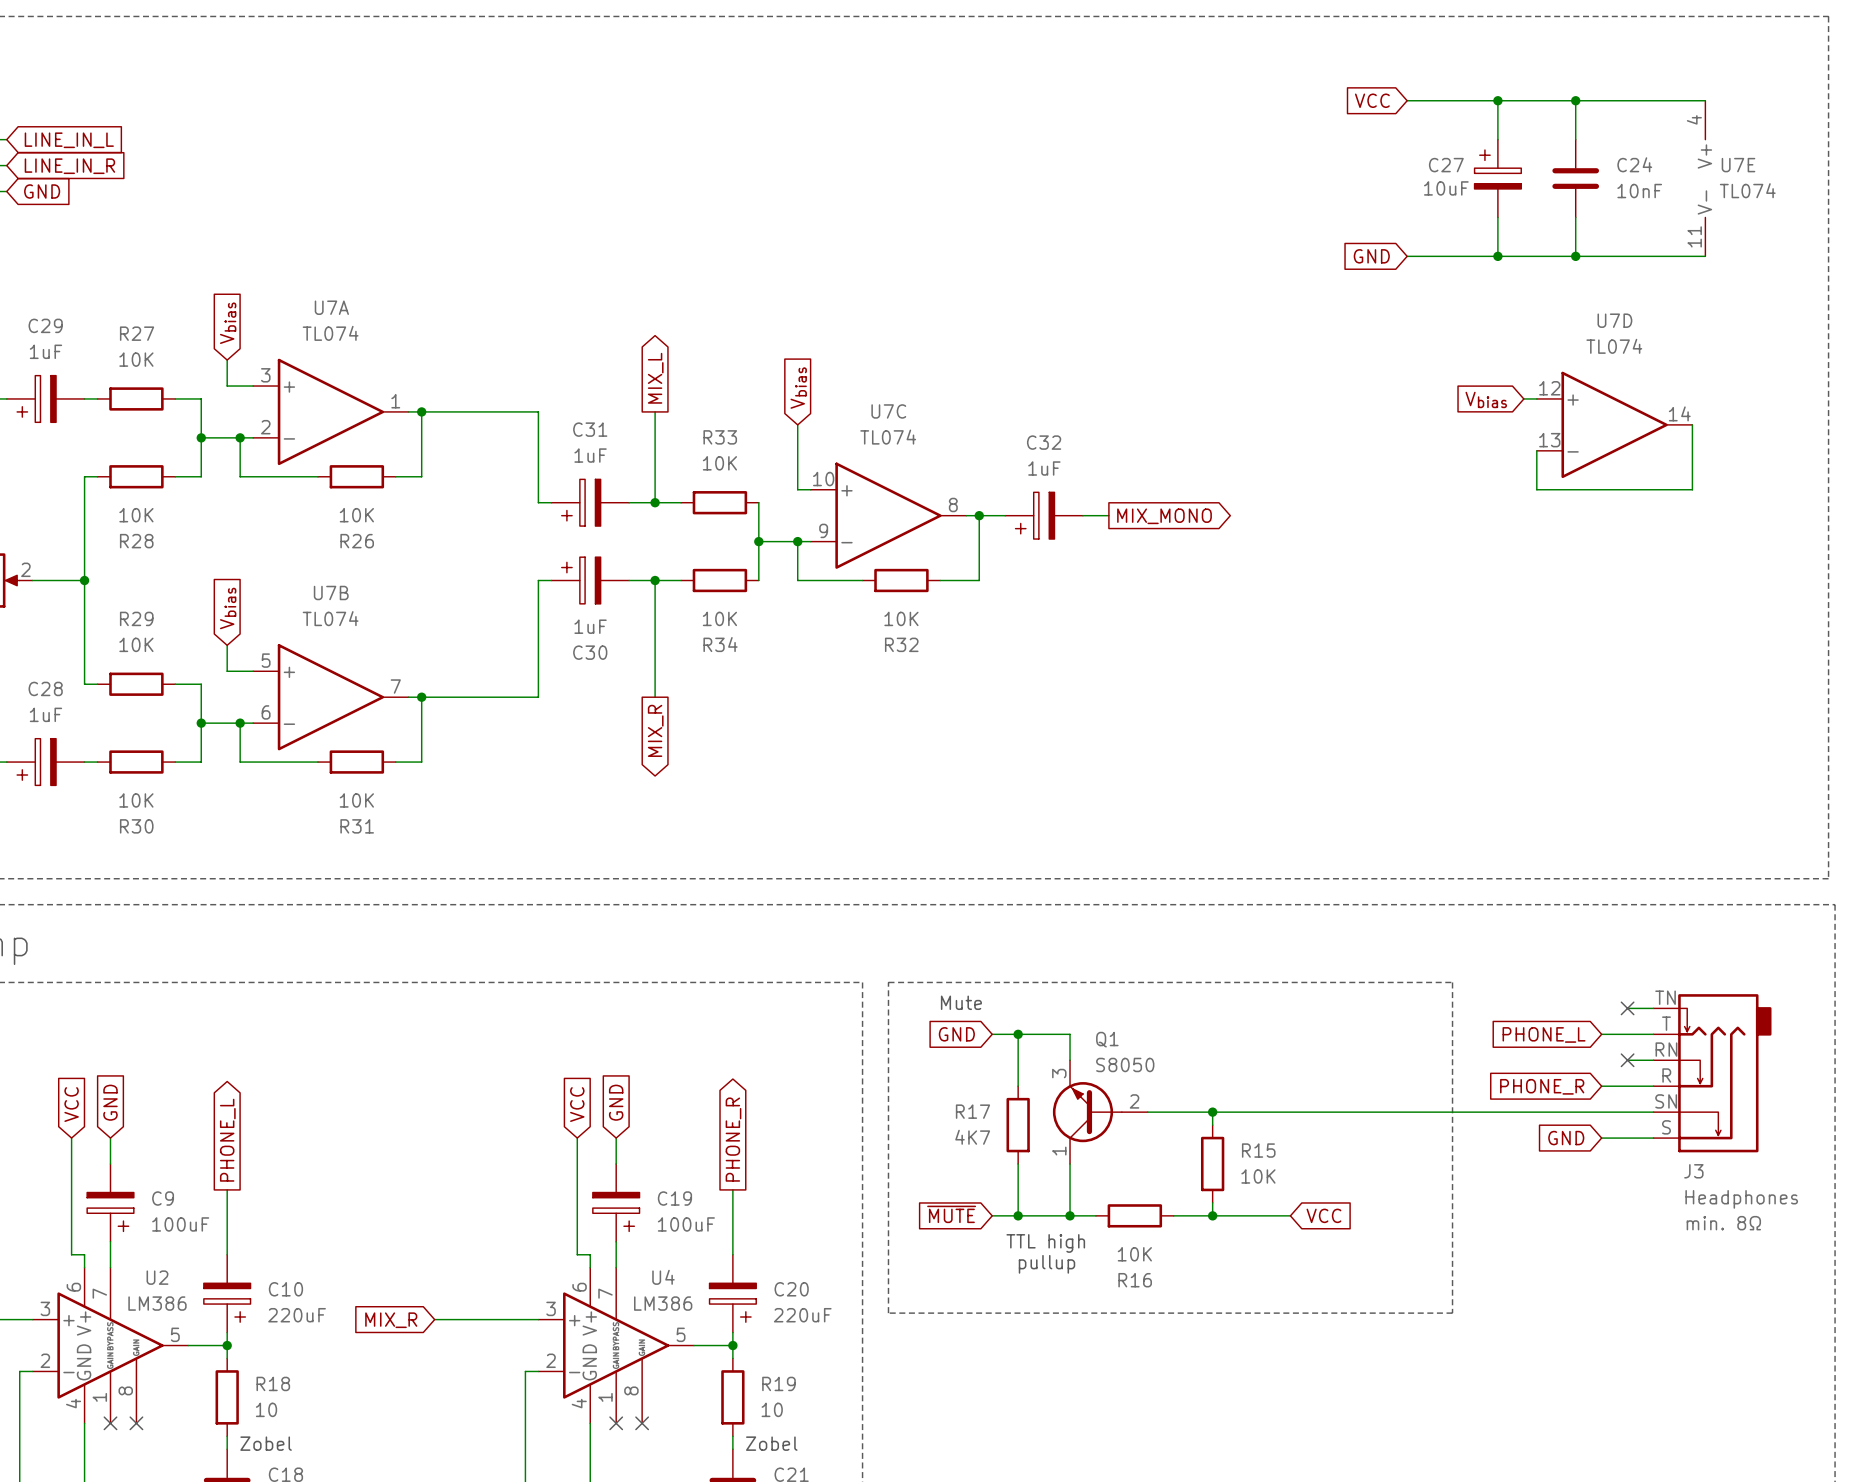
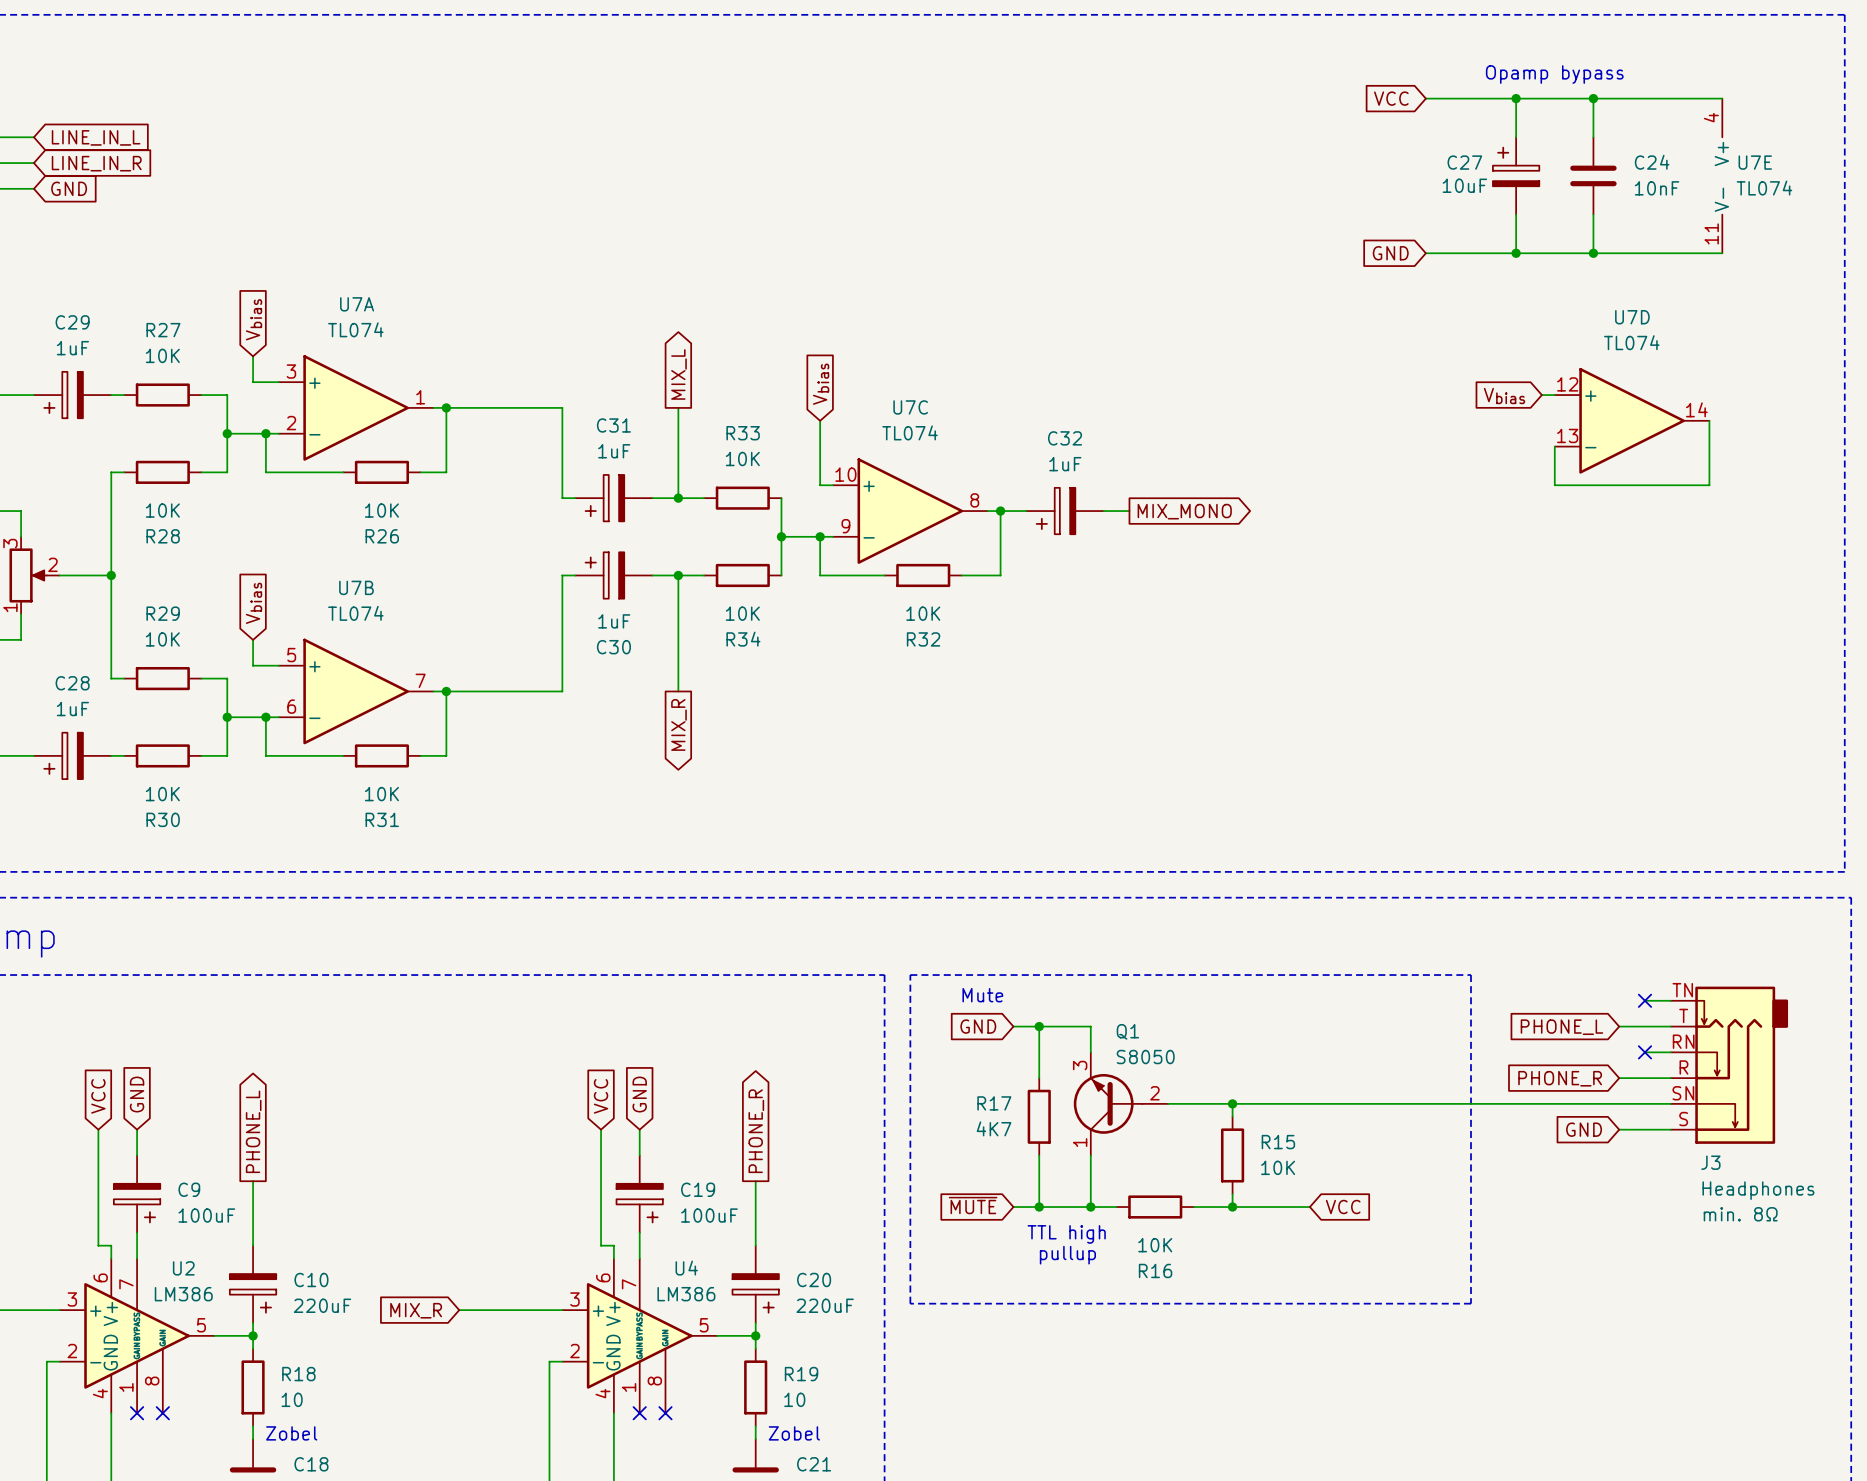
text: none -> Opamp bypass (1554, 74)

